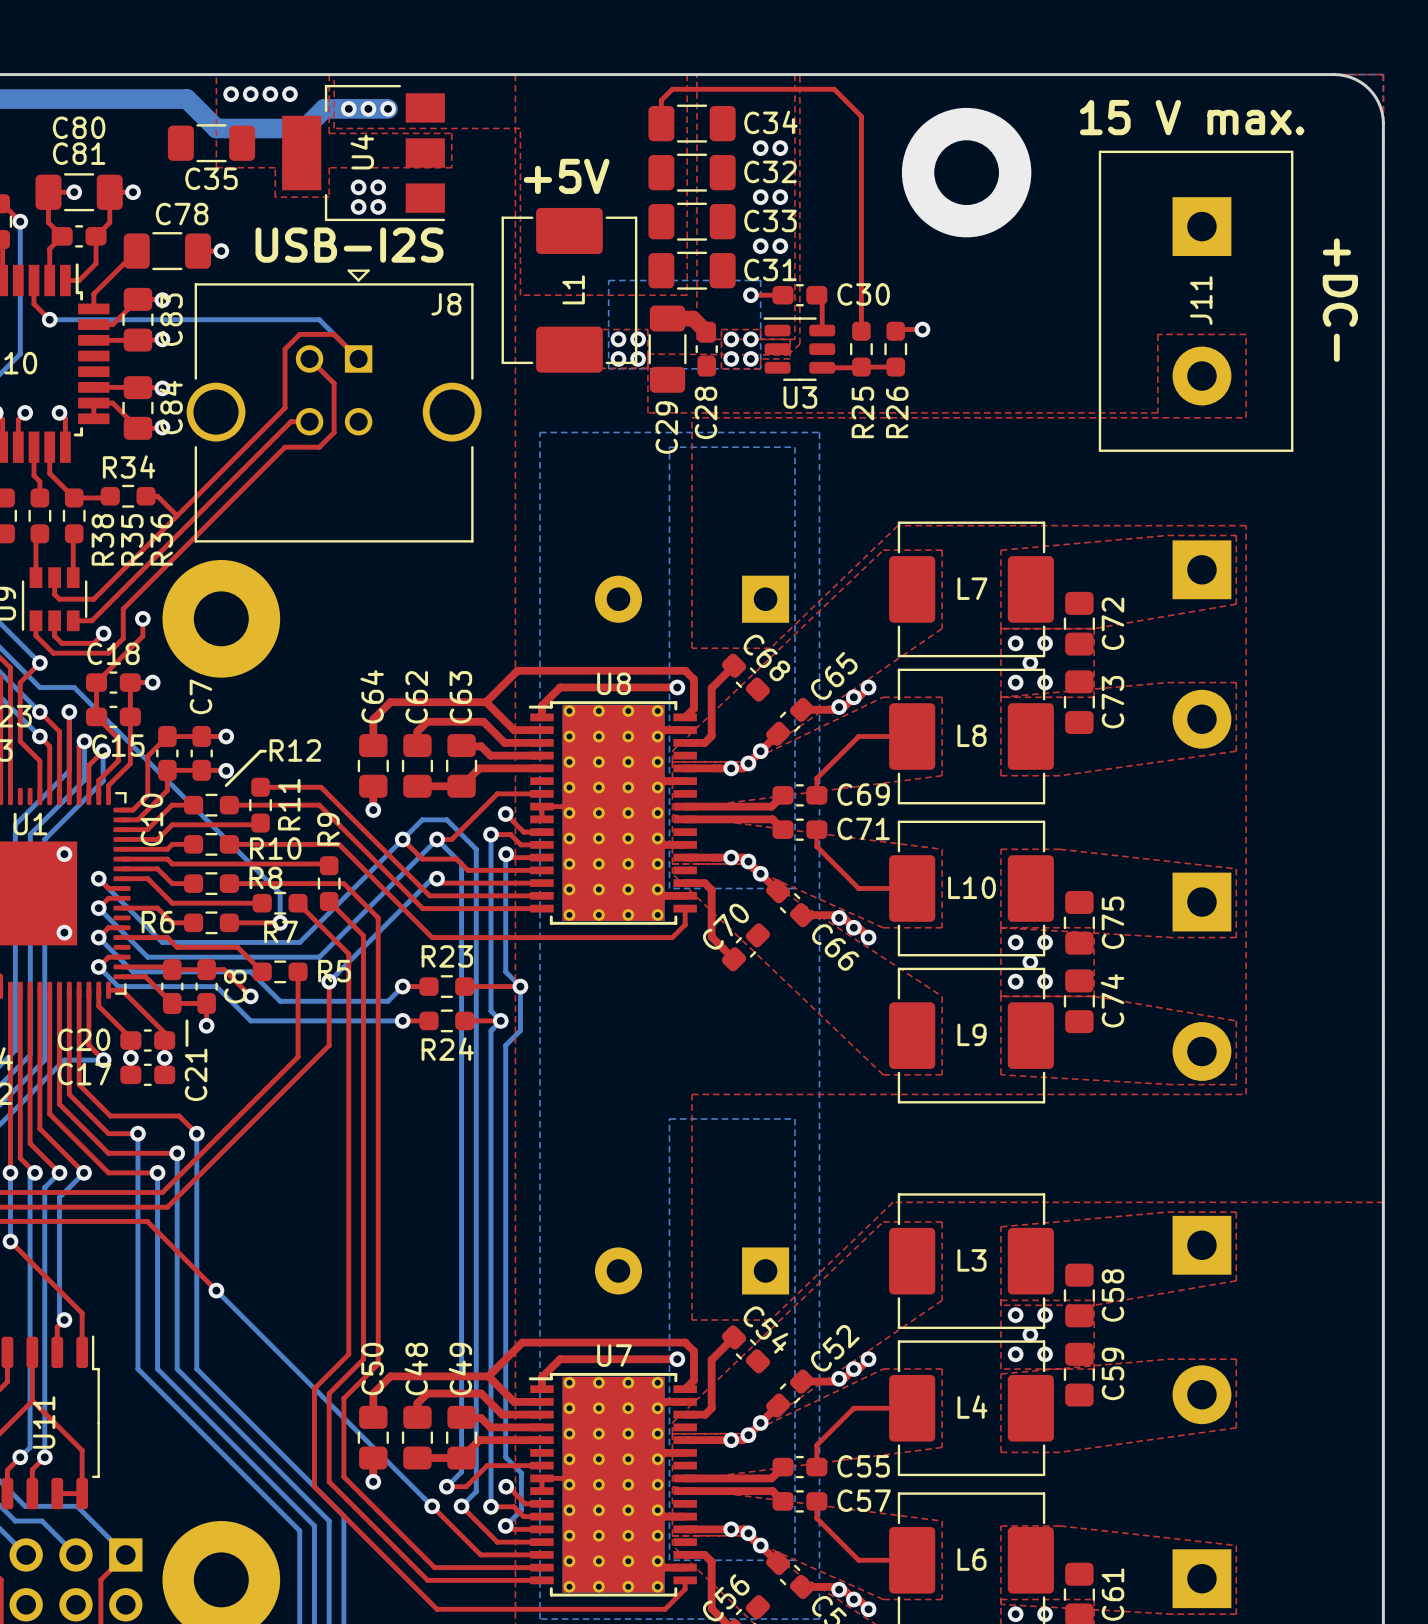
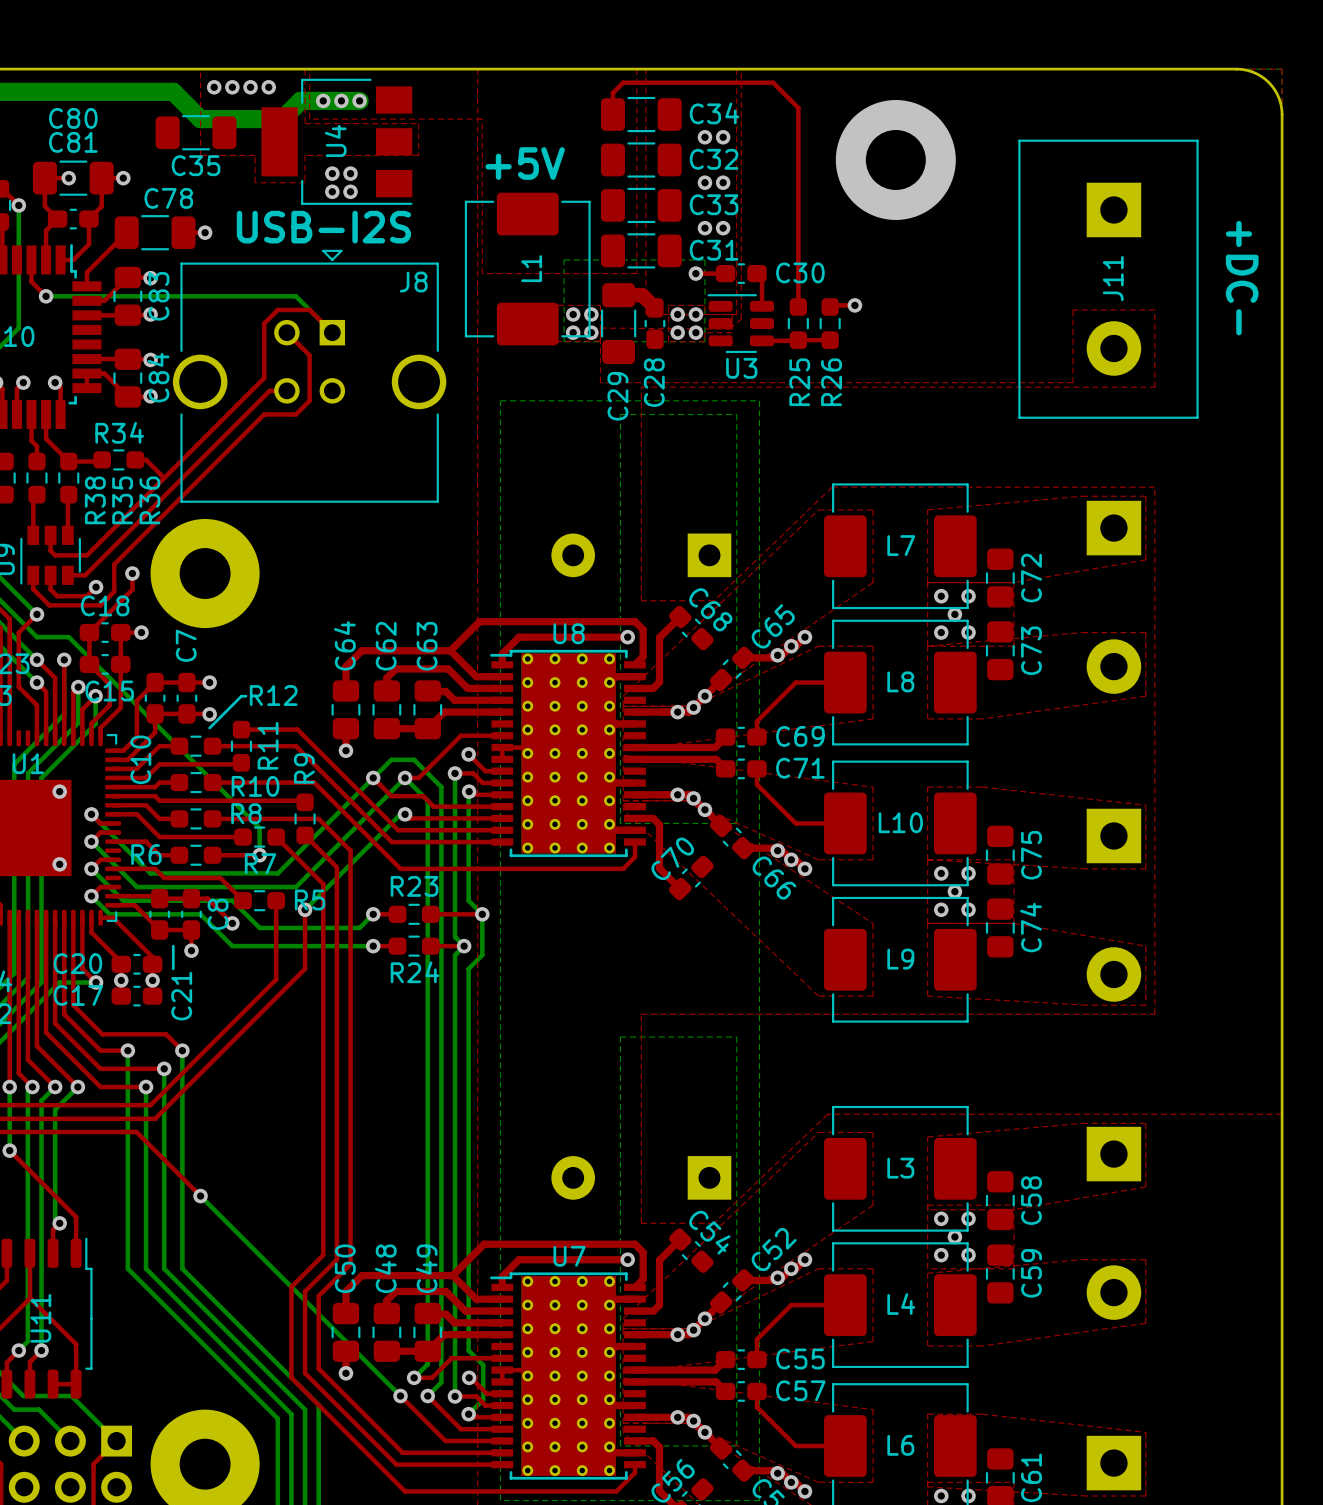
text: 15 V max. (1192, 117) -> none

